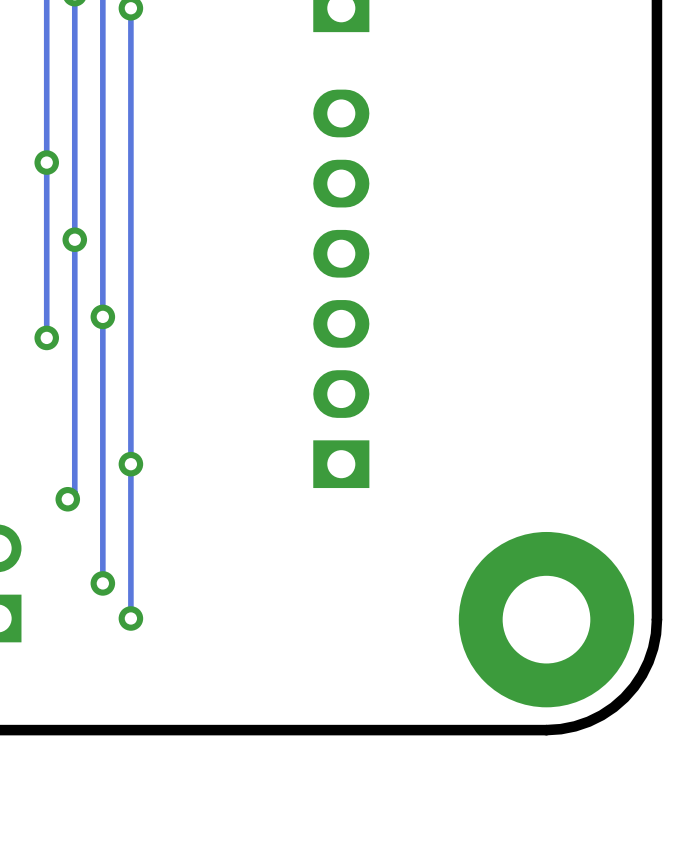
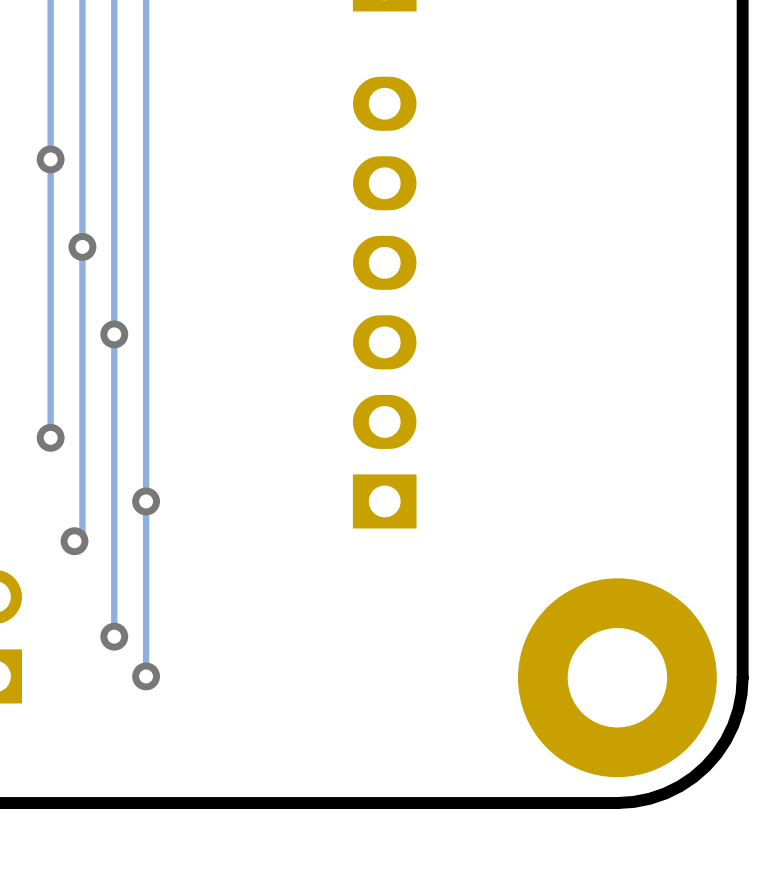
track: none -> (50, 358) (50, 437)
via position: (46, 337) -> (50, 437)

